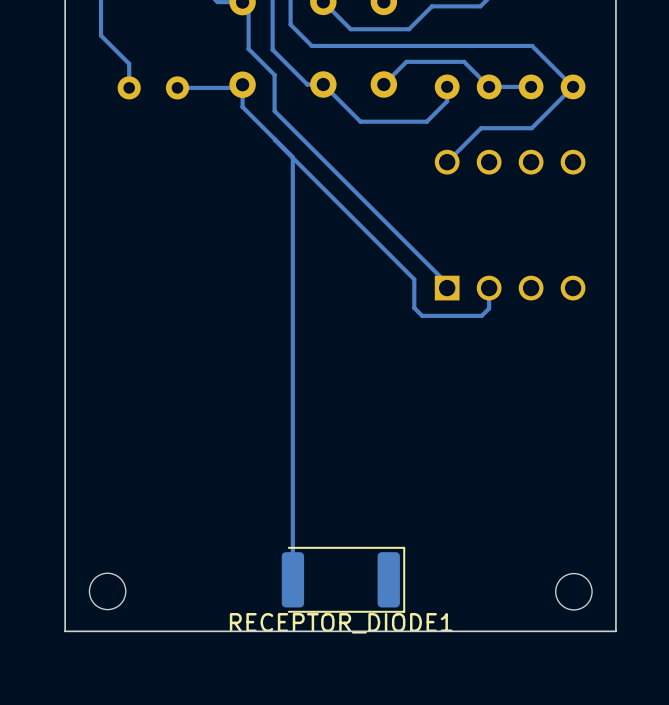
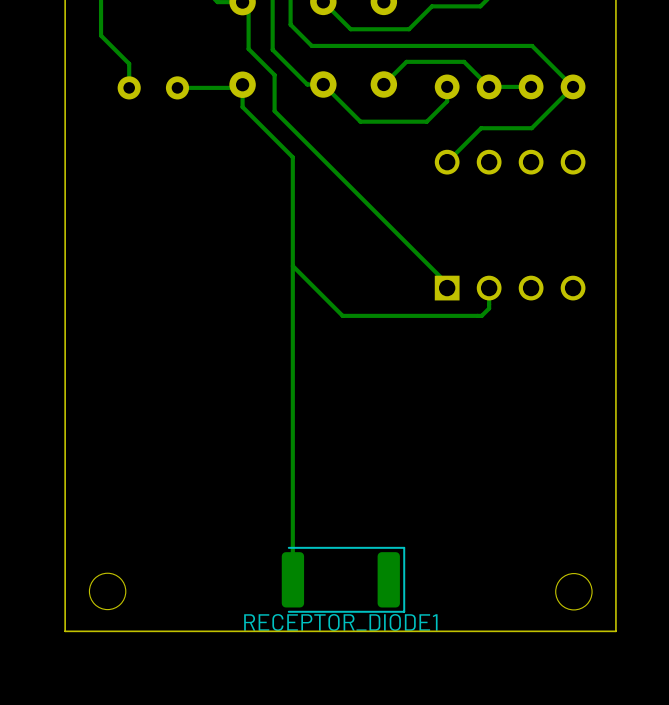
bottom track: (274, 138) (414, 279) (414, 308) (422, 315) -> (292, 266) (342, 315) (422, 315)

